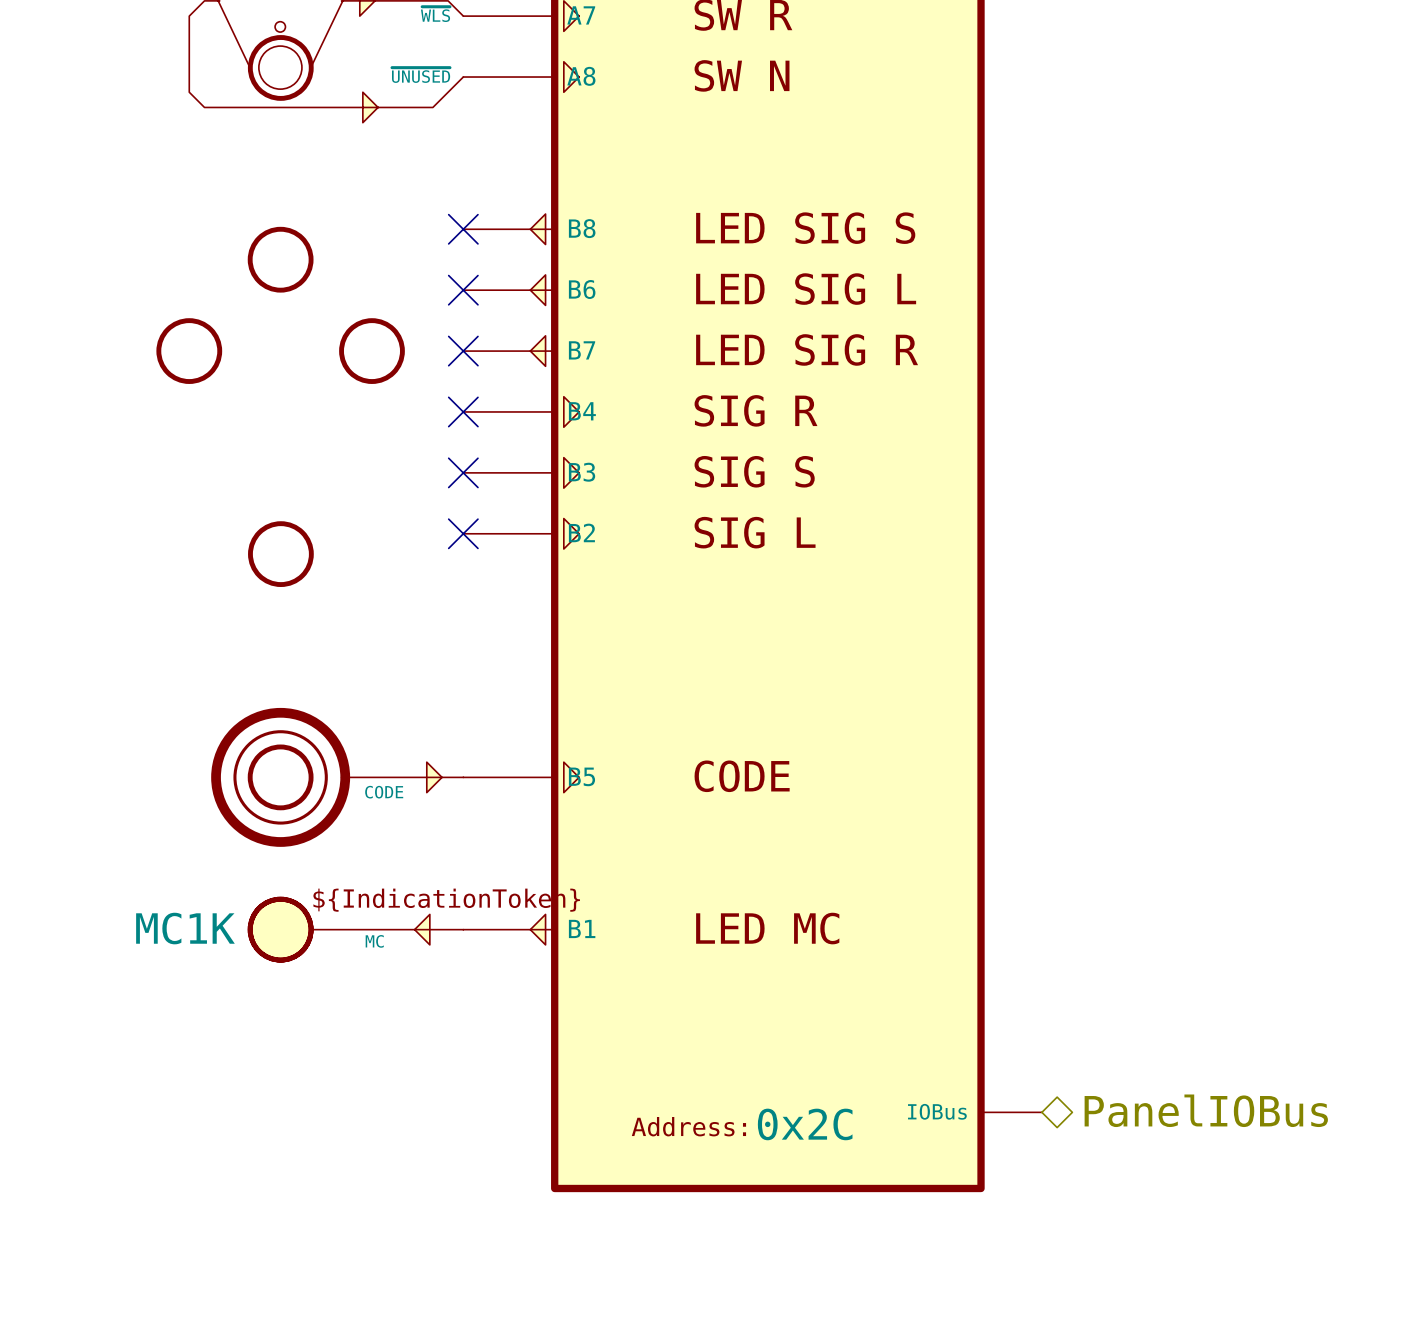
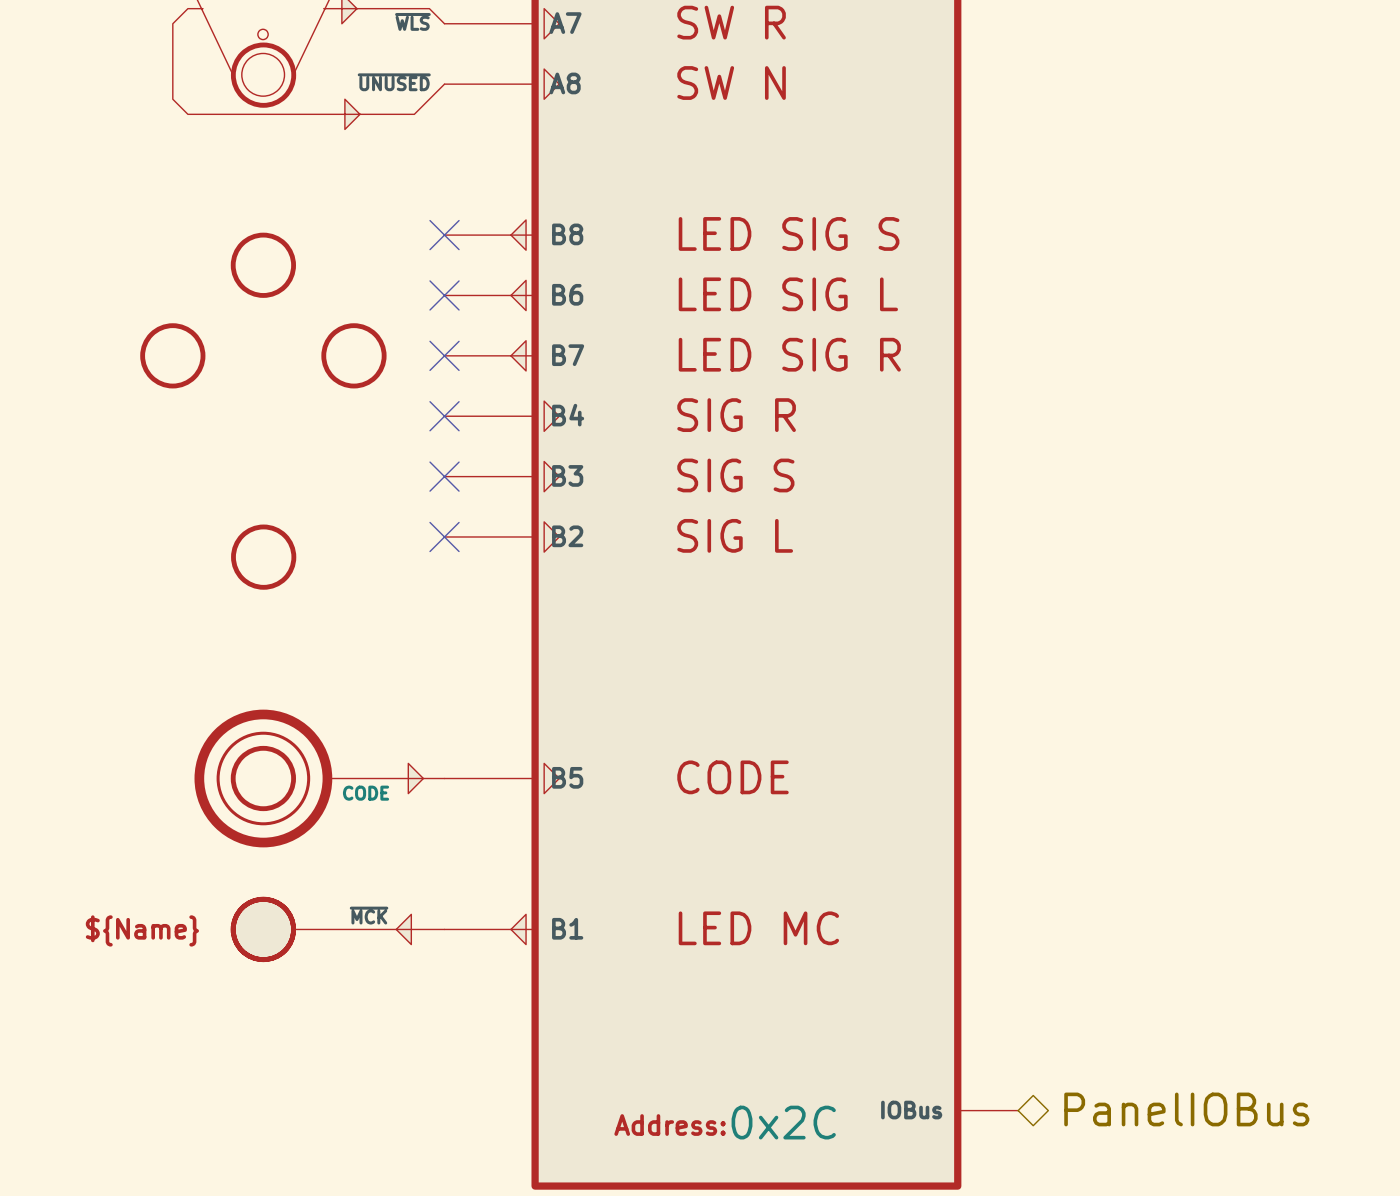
part text: ${IndicationToken} (446, 900) -> none
part pin name: none -> ~{MCK} (369, 915)
part text: MC1K (185, 928) -> none
part text: none -> ${Name} (142, 930)
part value: MC (374, 941) -> none

